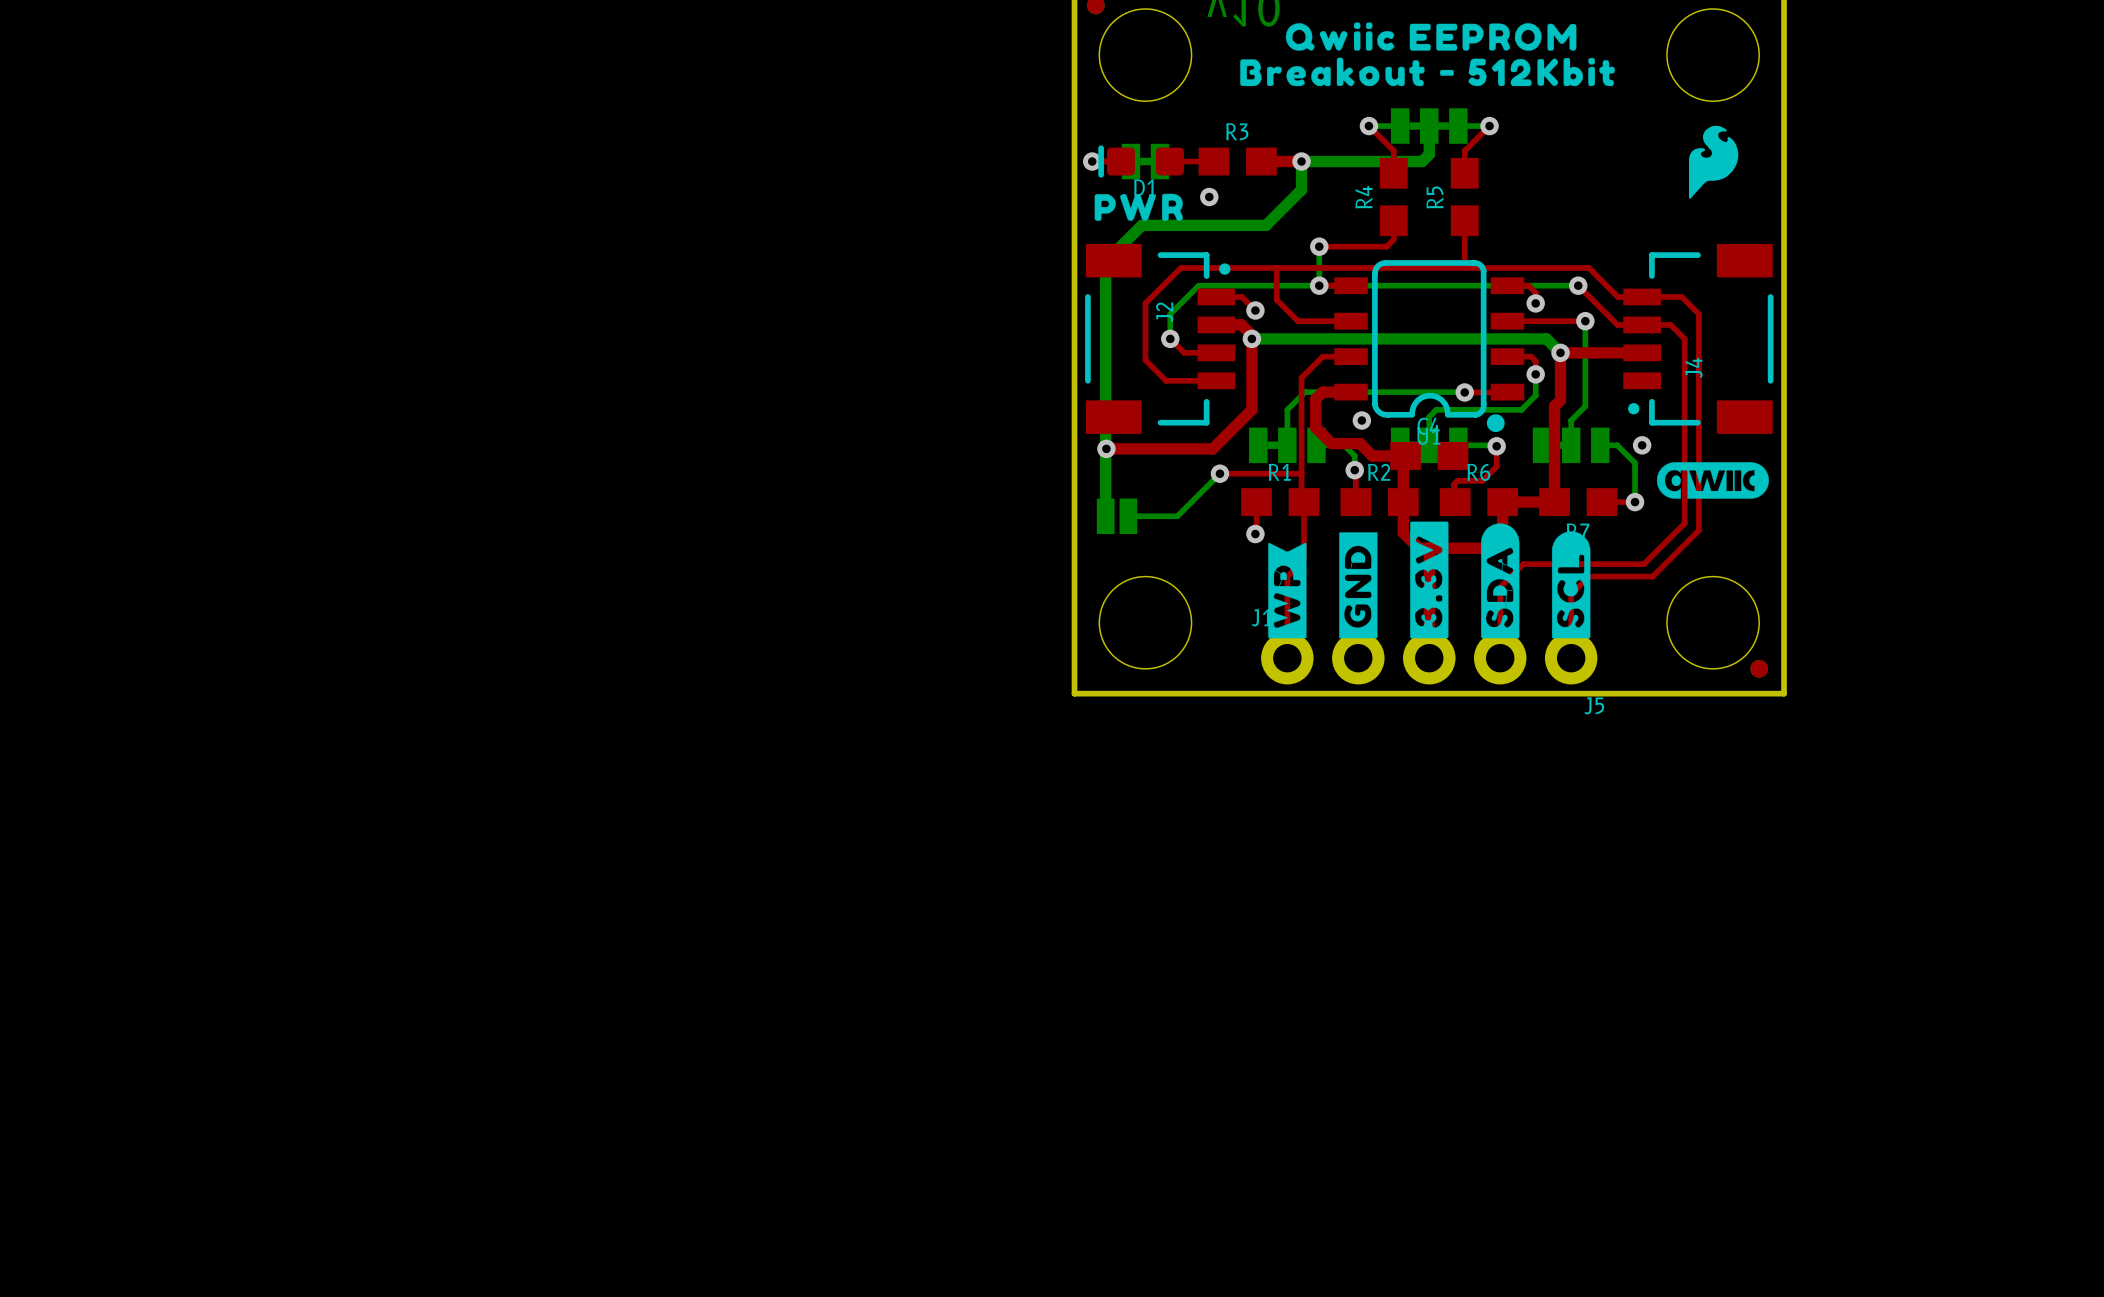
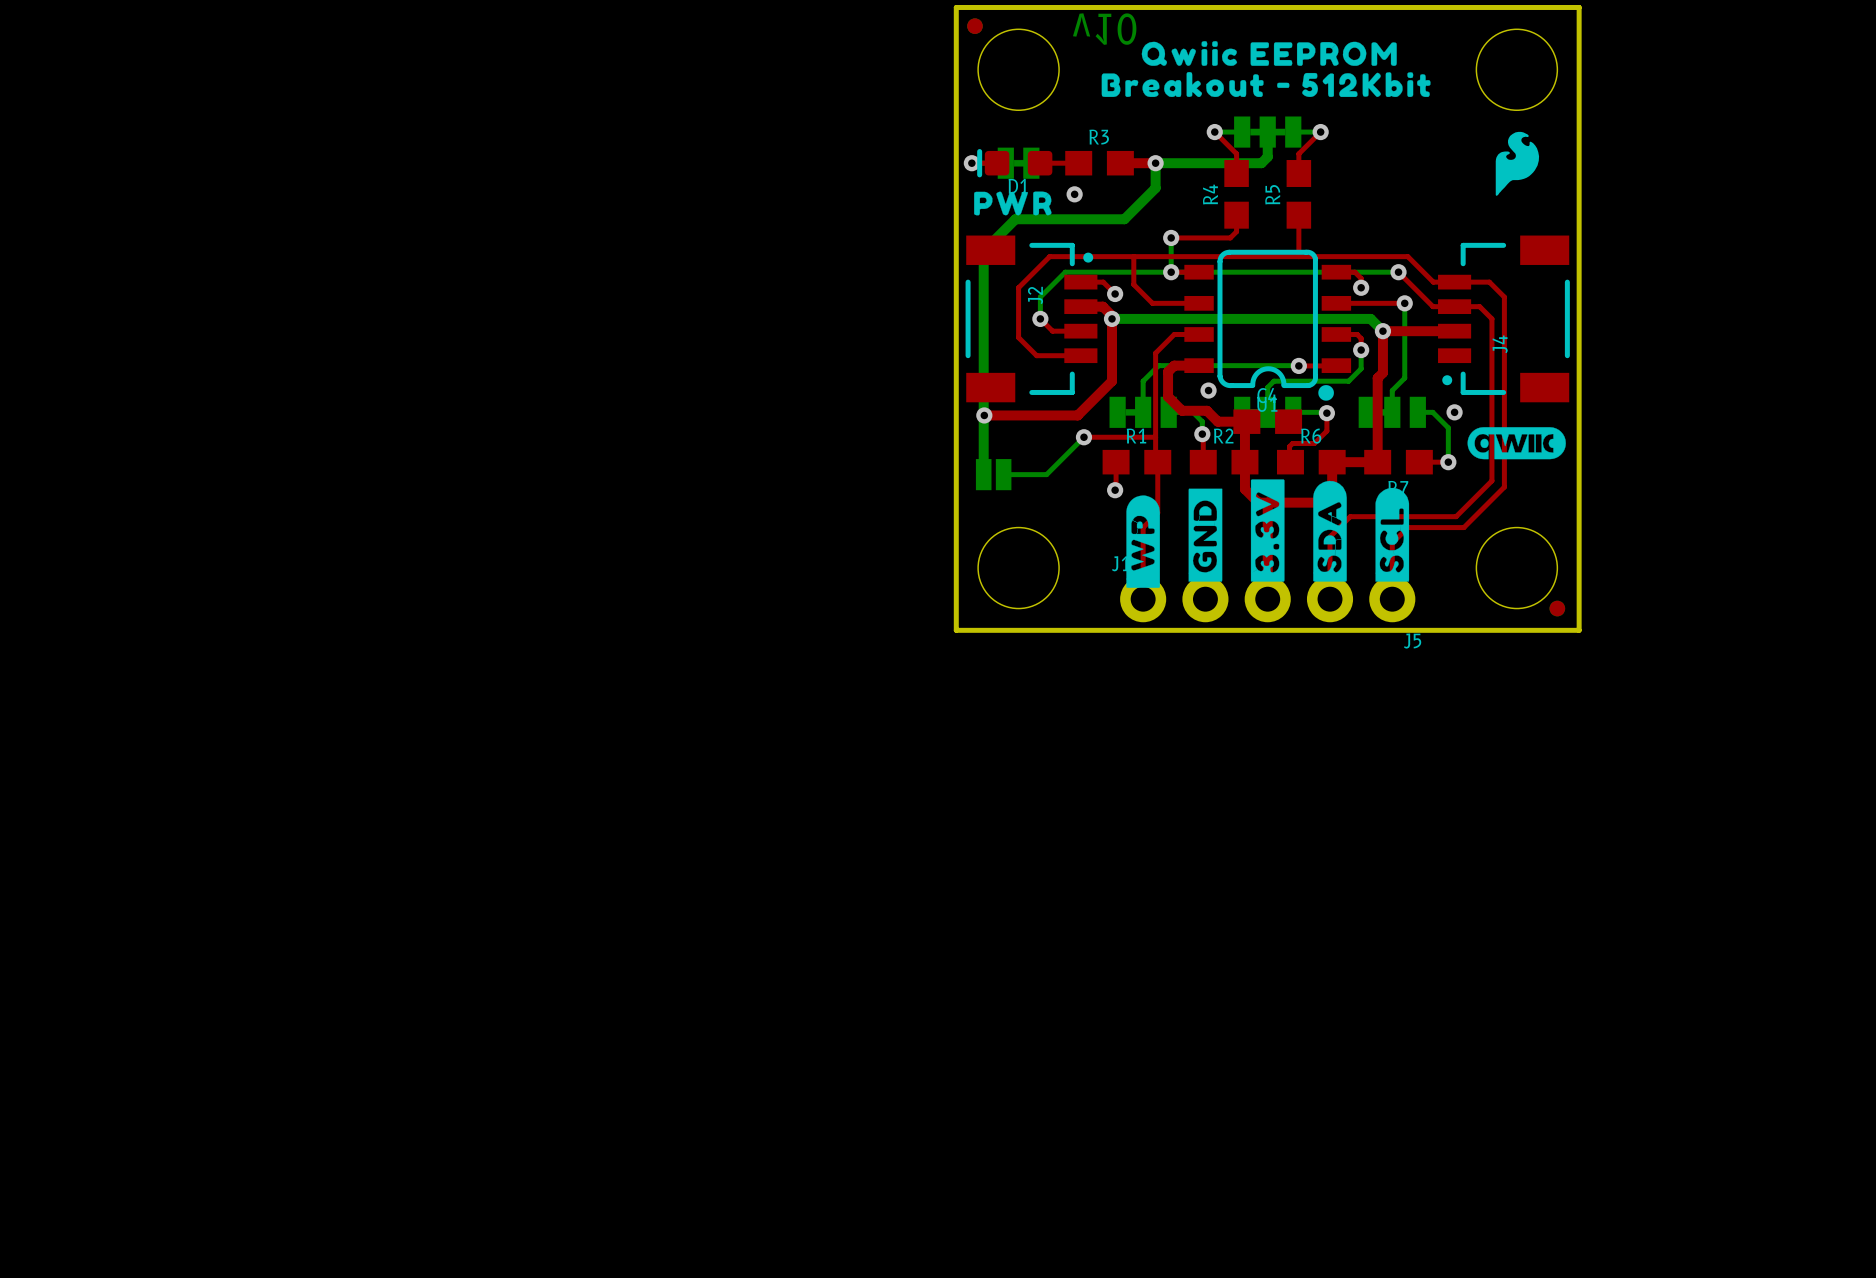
drawing shape: [1268, 542, 1307, 639] -> [1126, 495, 1160, 588]

